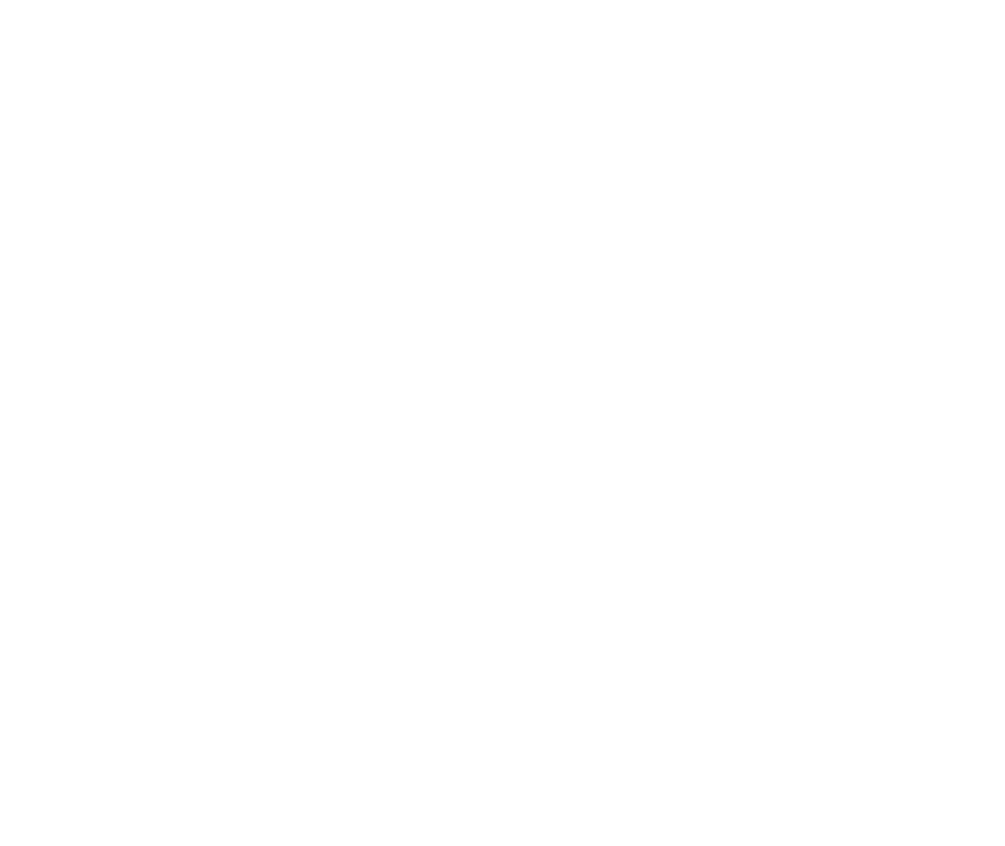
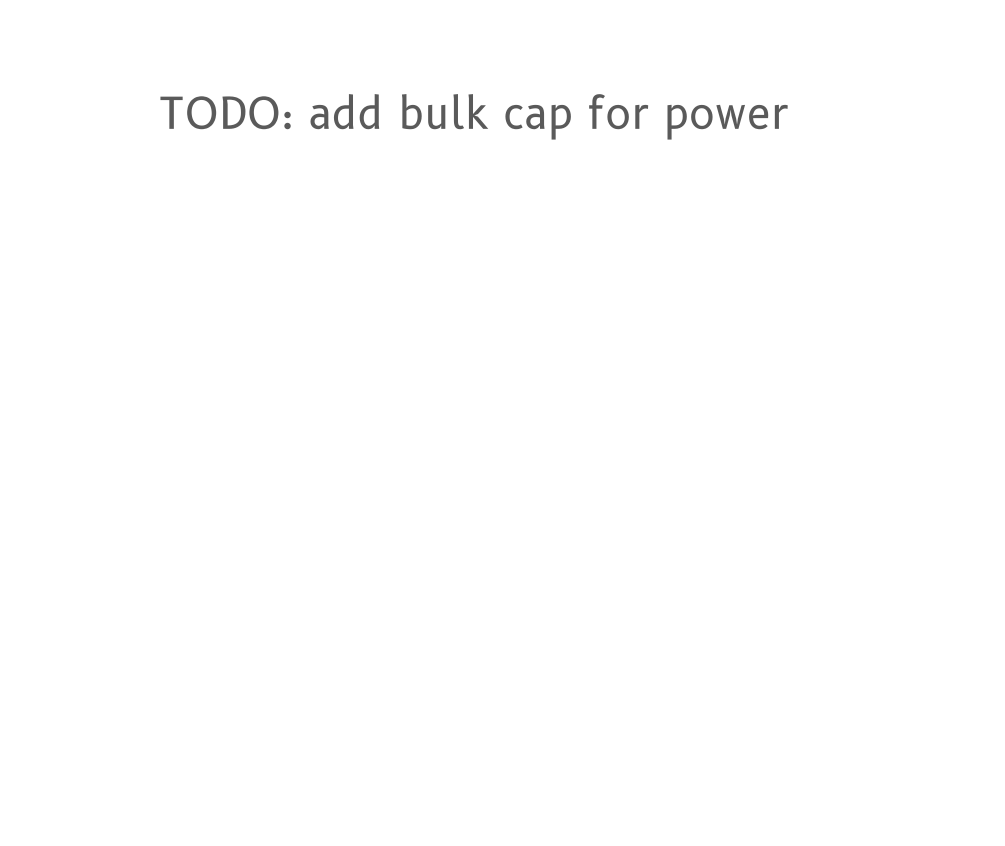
text: none -> TODO: add bulk cap for power (474, 116)

